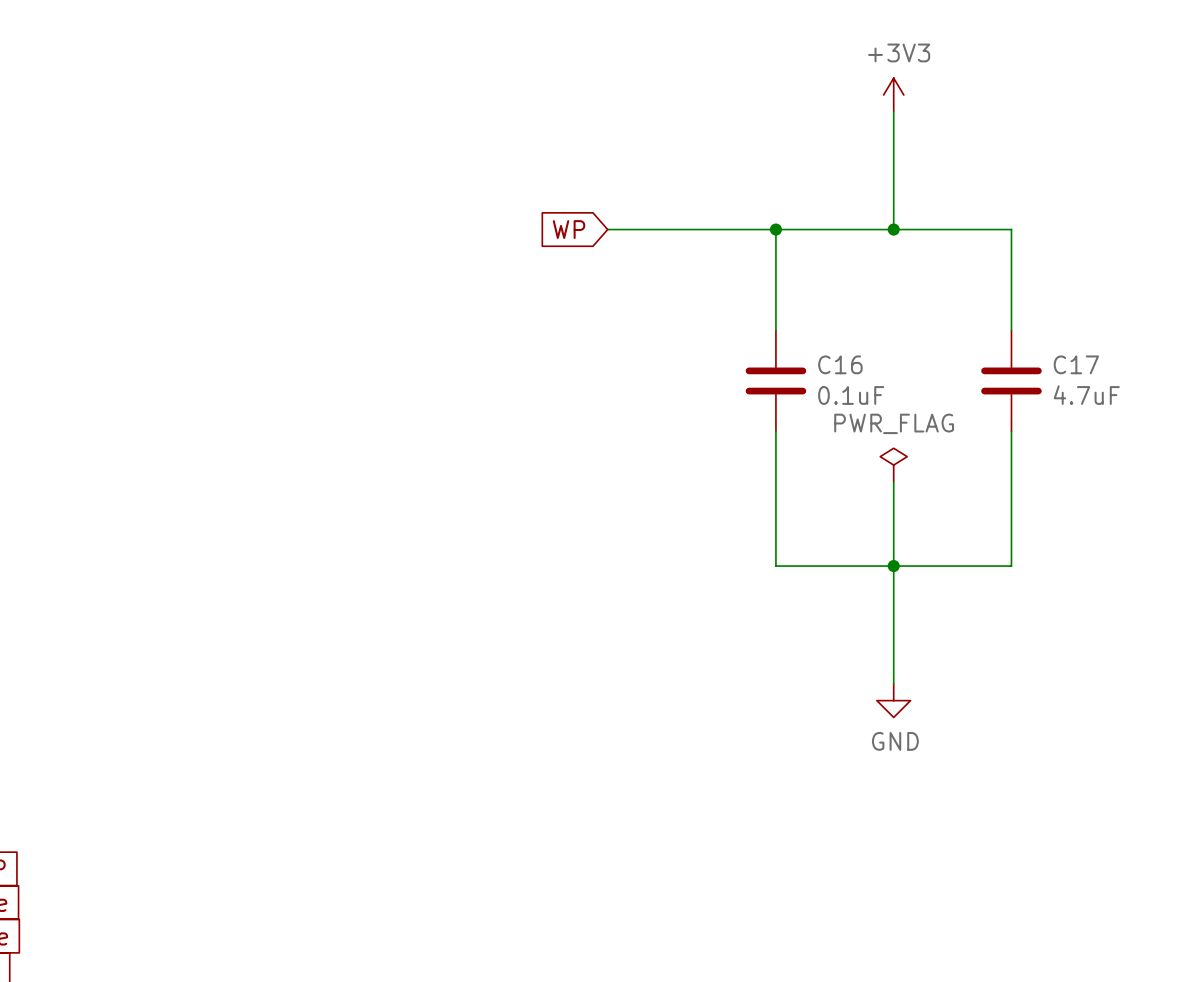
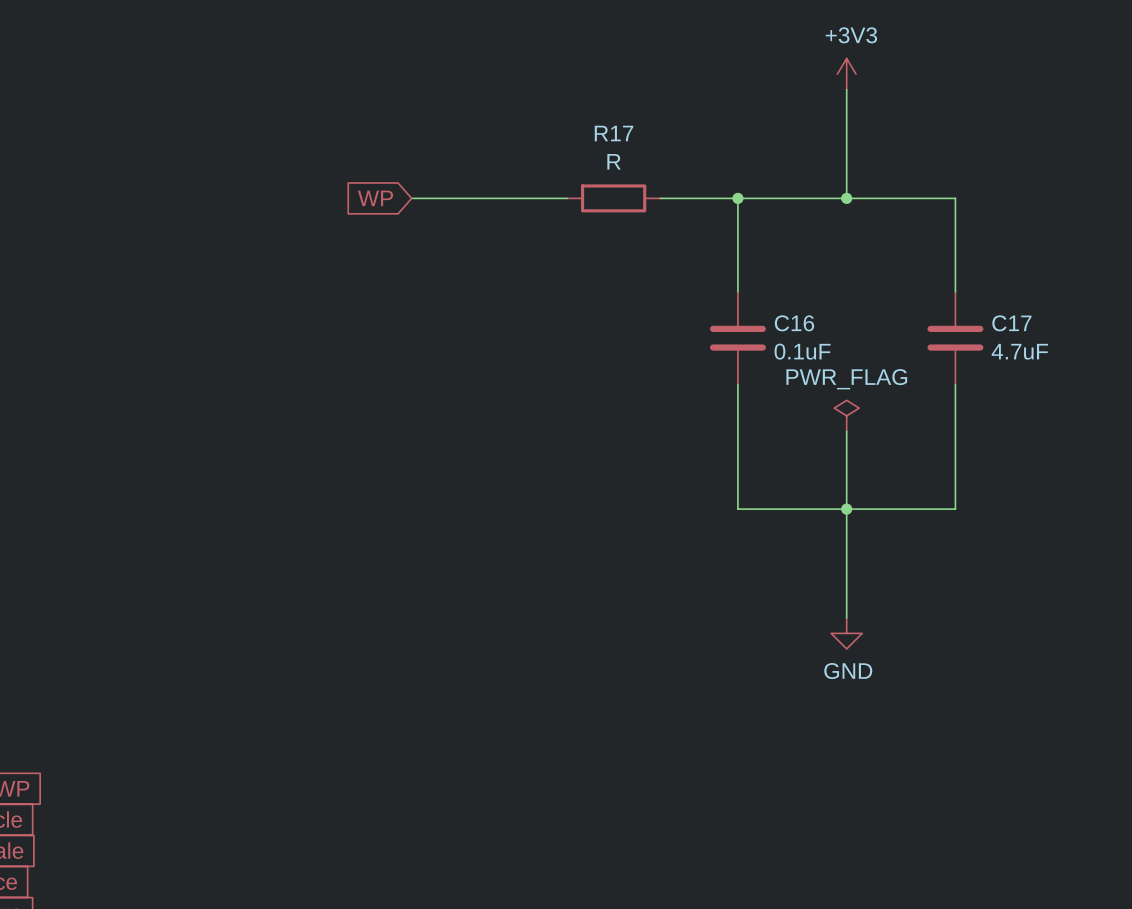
wire: none -> (411, 198) (567, 198)
global label position: WP (569, 229) -> WP (375, 198)
wire: (607, 229) (691, 229) -> none
R17: none -> R (613, 198)

